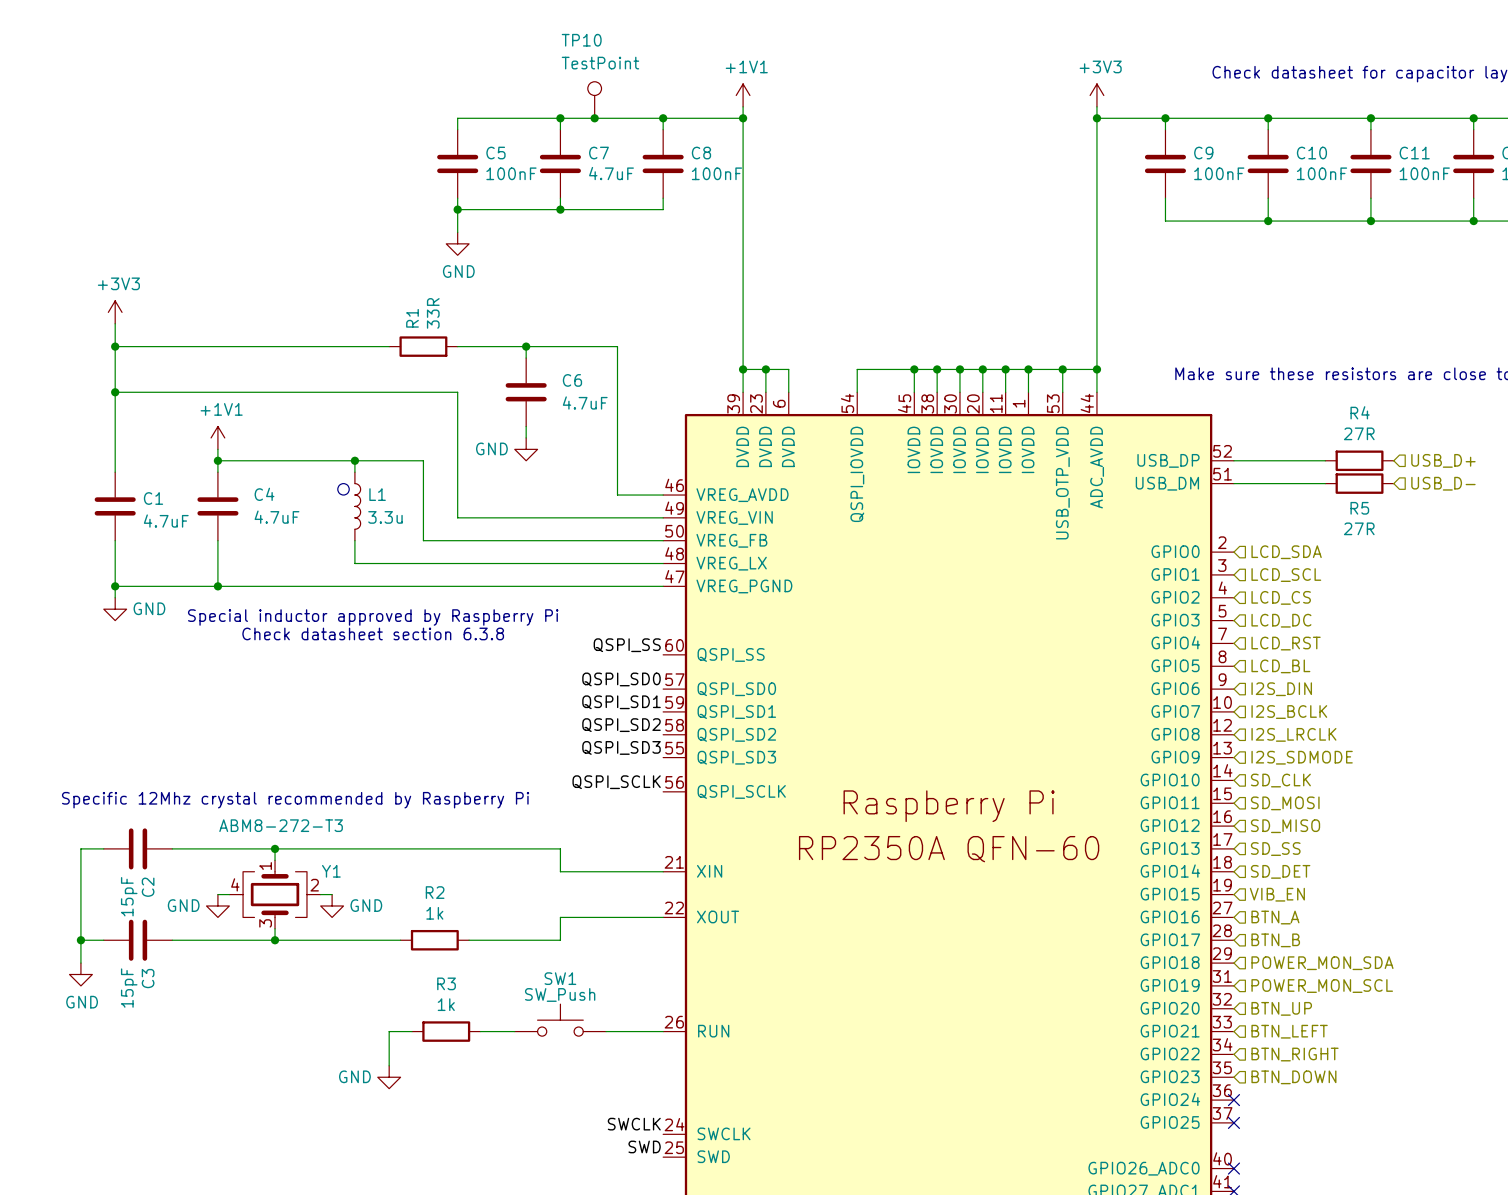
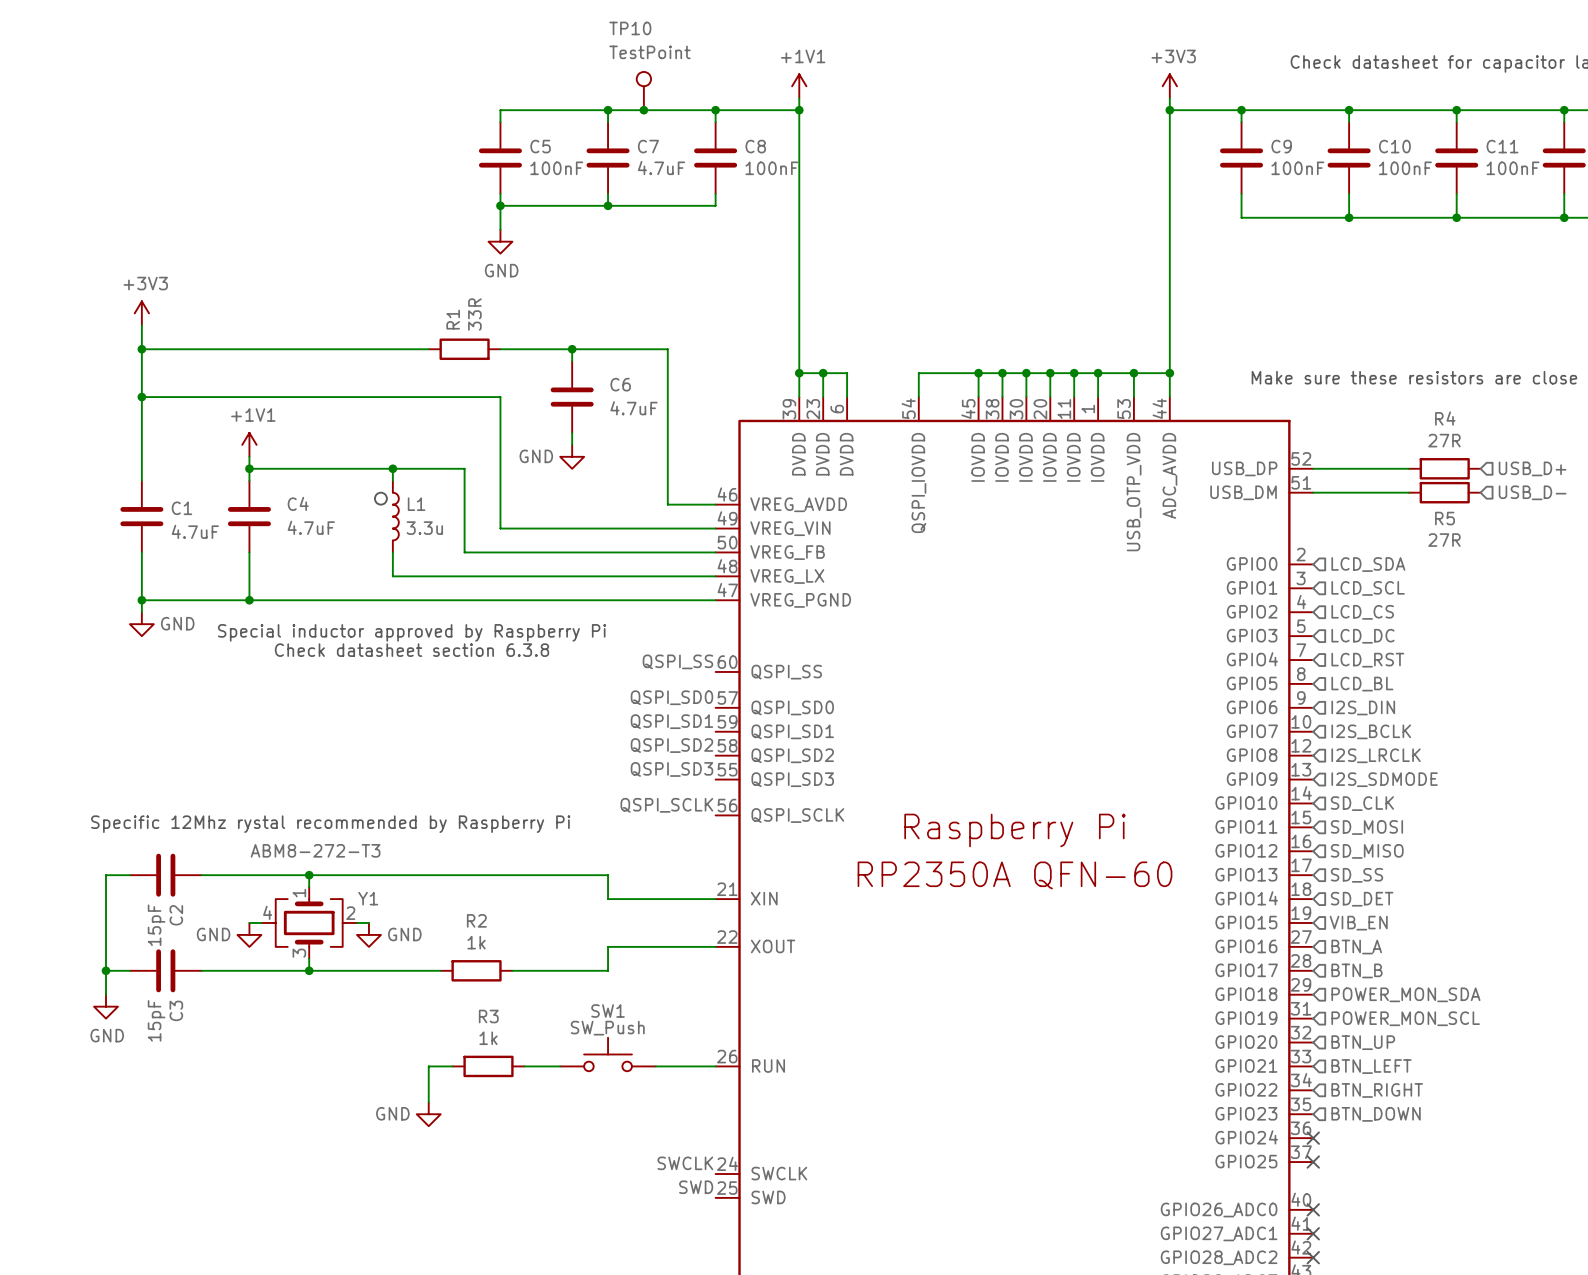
text: Specific 12Mhz crystal recommended by Raspberry Pi (295, 800) -> Specific 12Mhz rystal recommended by Raspberry Pi (330, 824)

